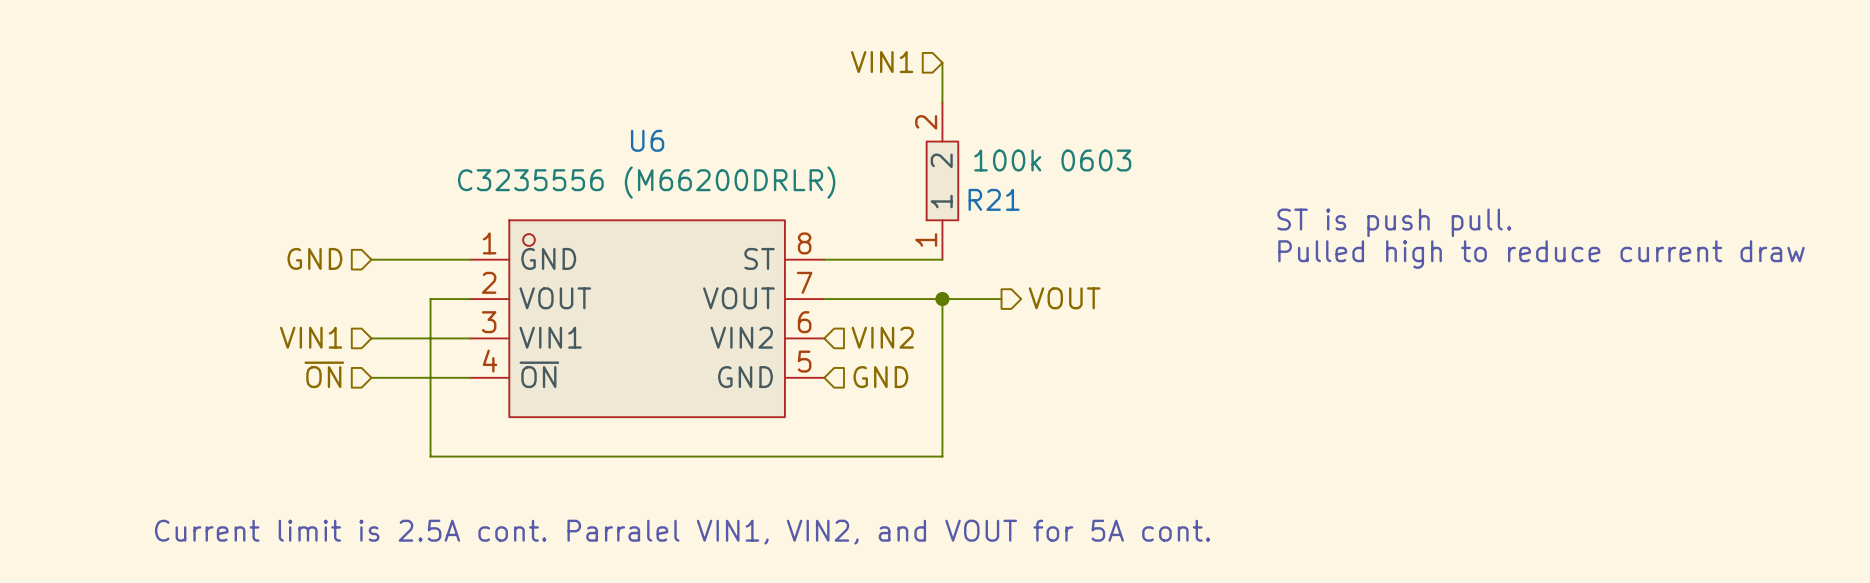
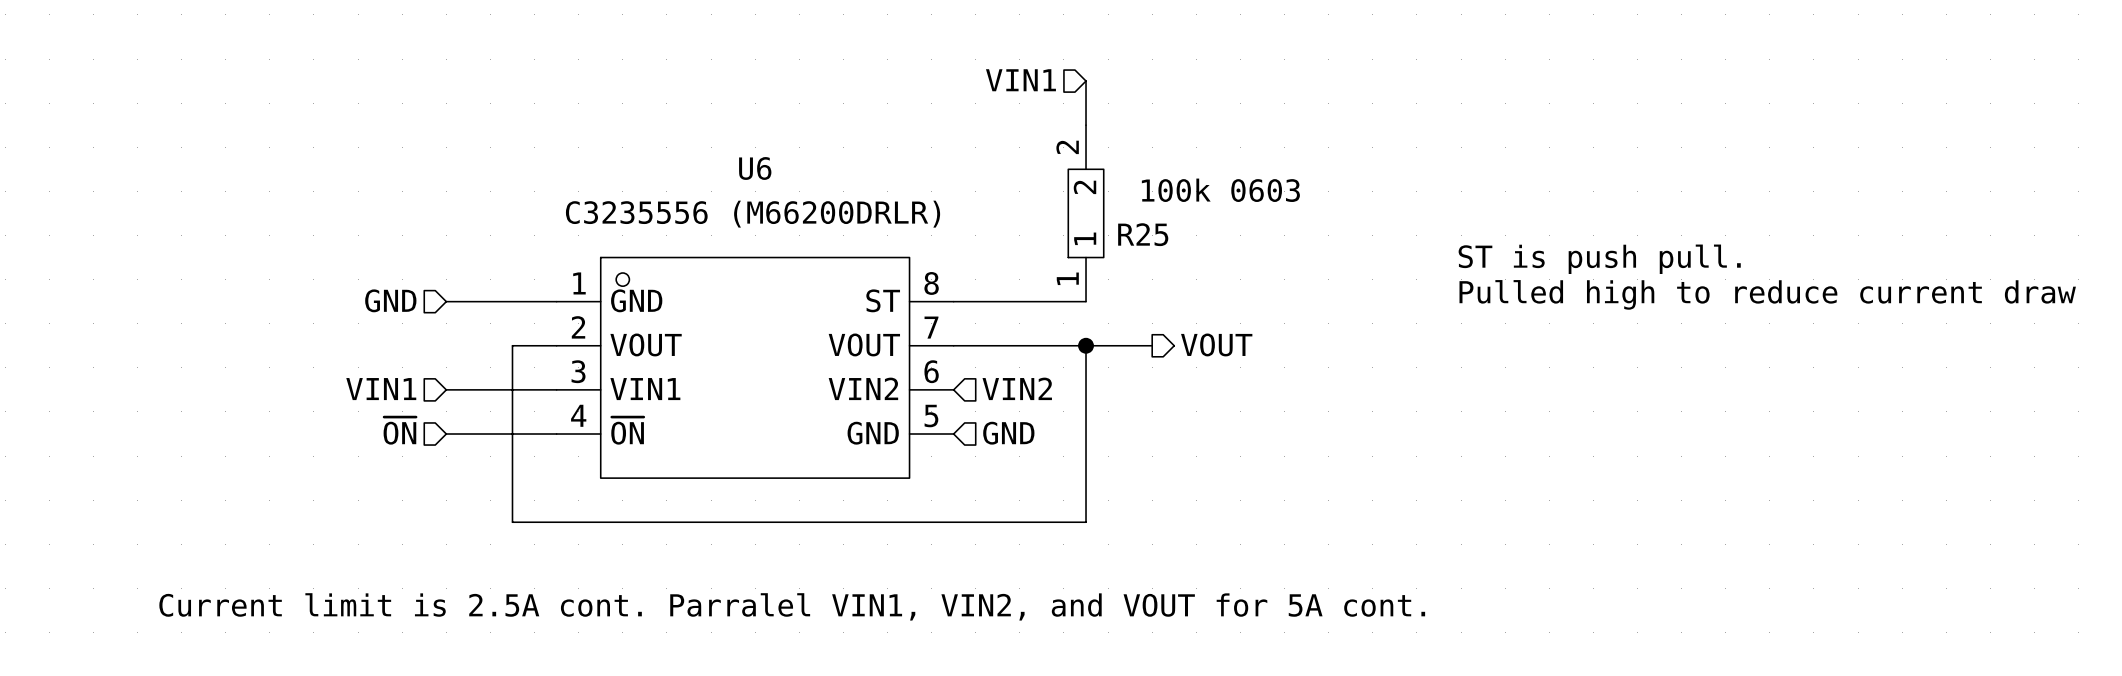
R21 name: R21 (994, 199) -> R25 (1143, 234)

